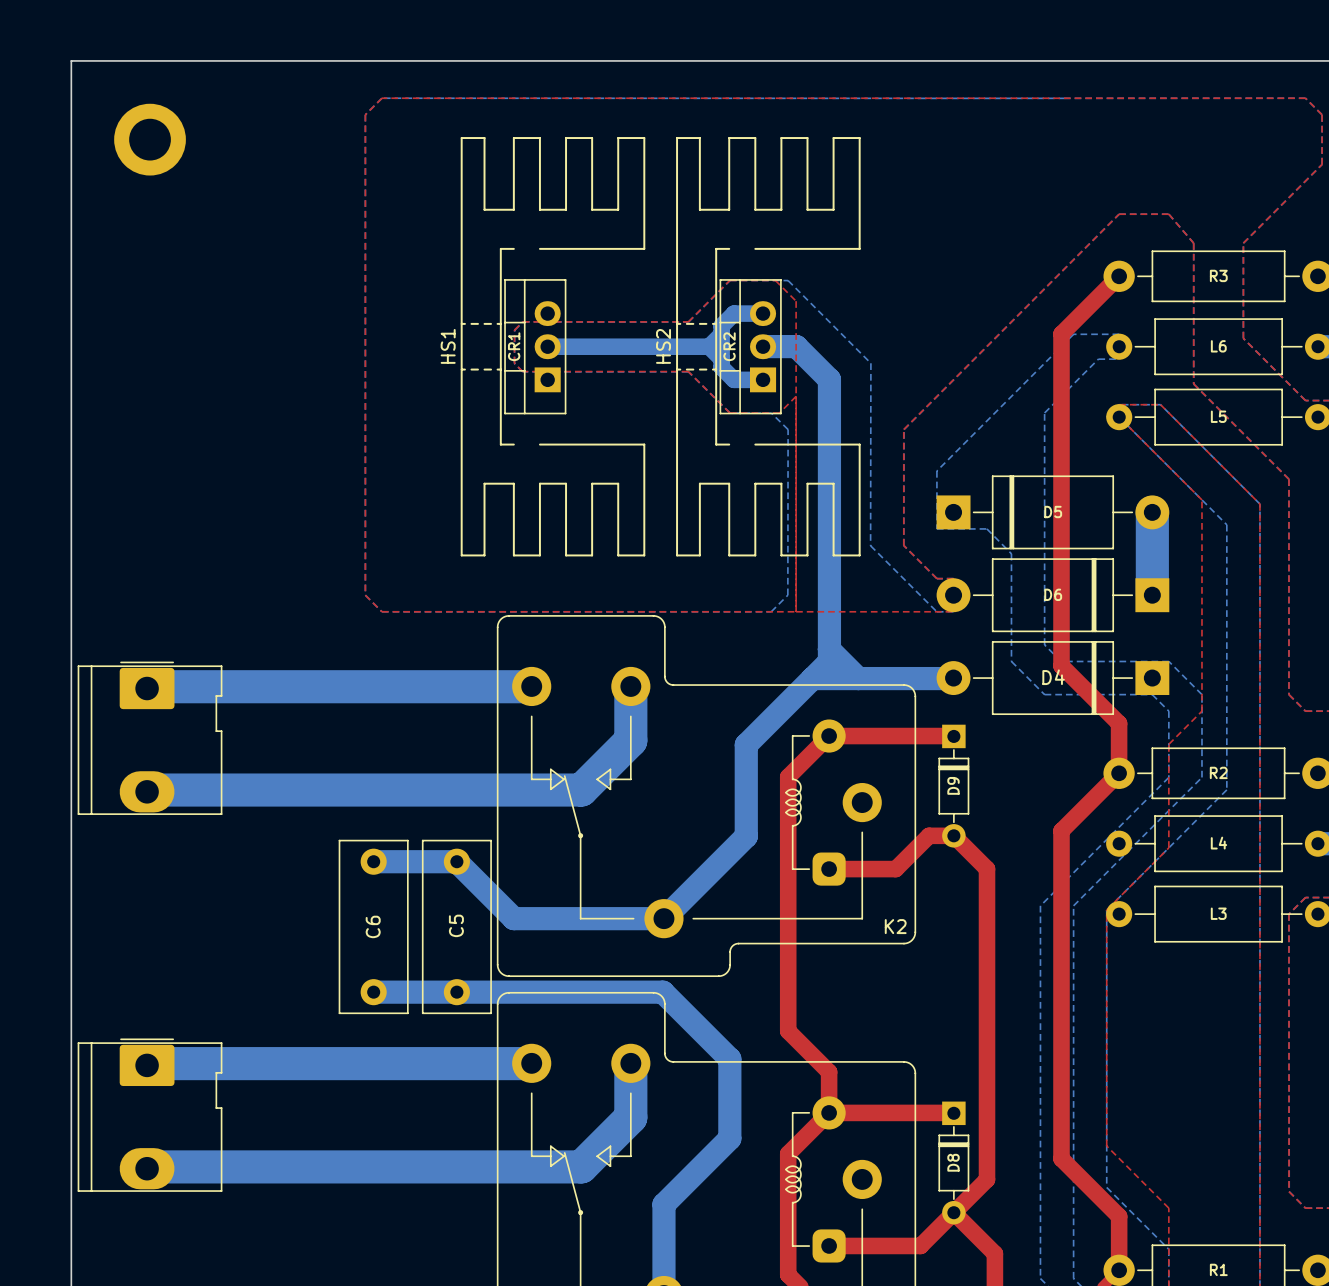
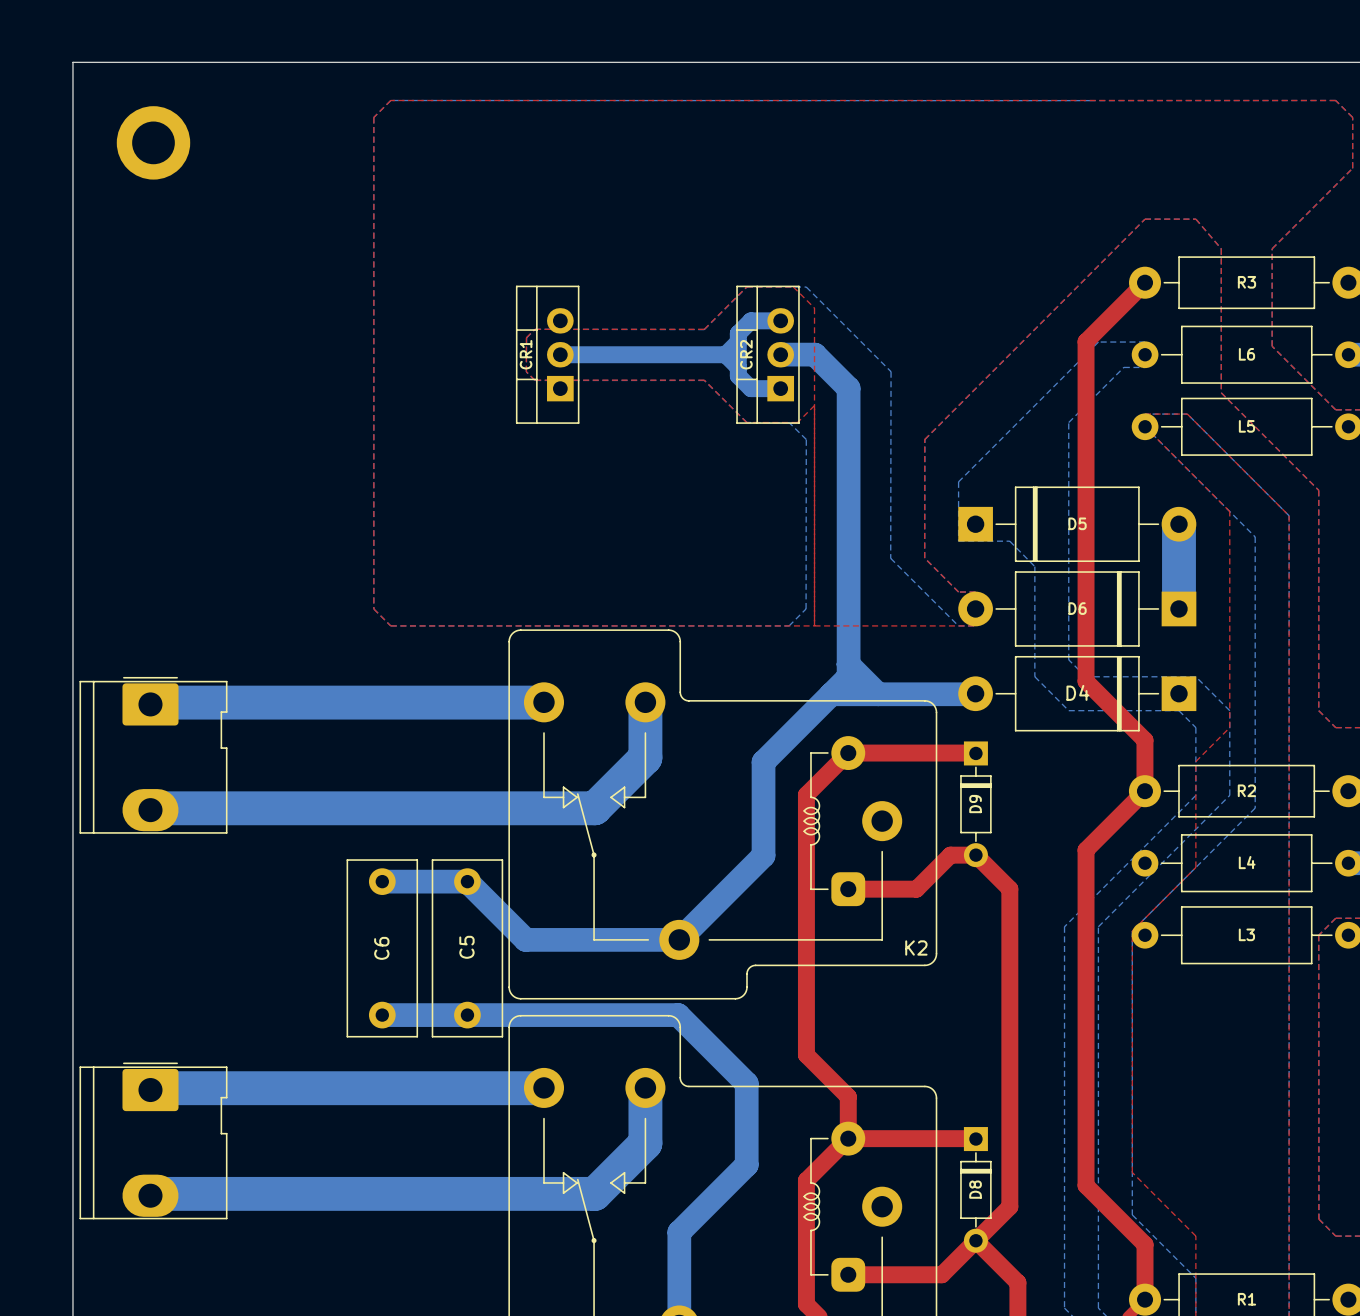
HS1: (553, 346) -> none
HS2: (768, 346) -> none

